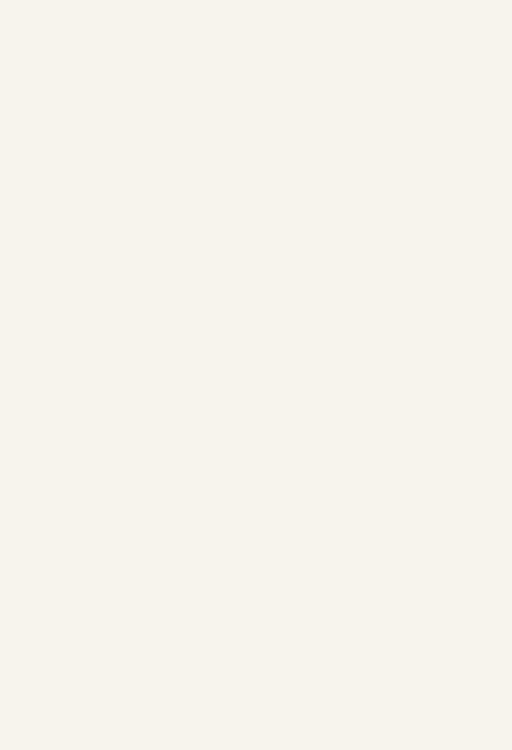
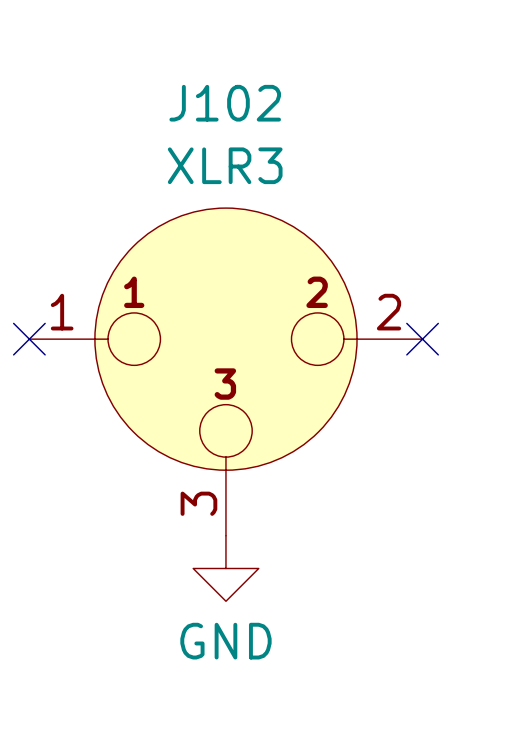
no-connect mark: none -> (29, 339)
no-connect mark: none -> (422, 339)
J102: none -> XLR3 (225, 371)
power symbol: none -> GND (225, 568)

